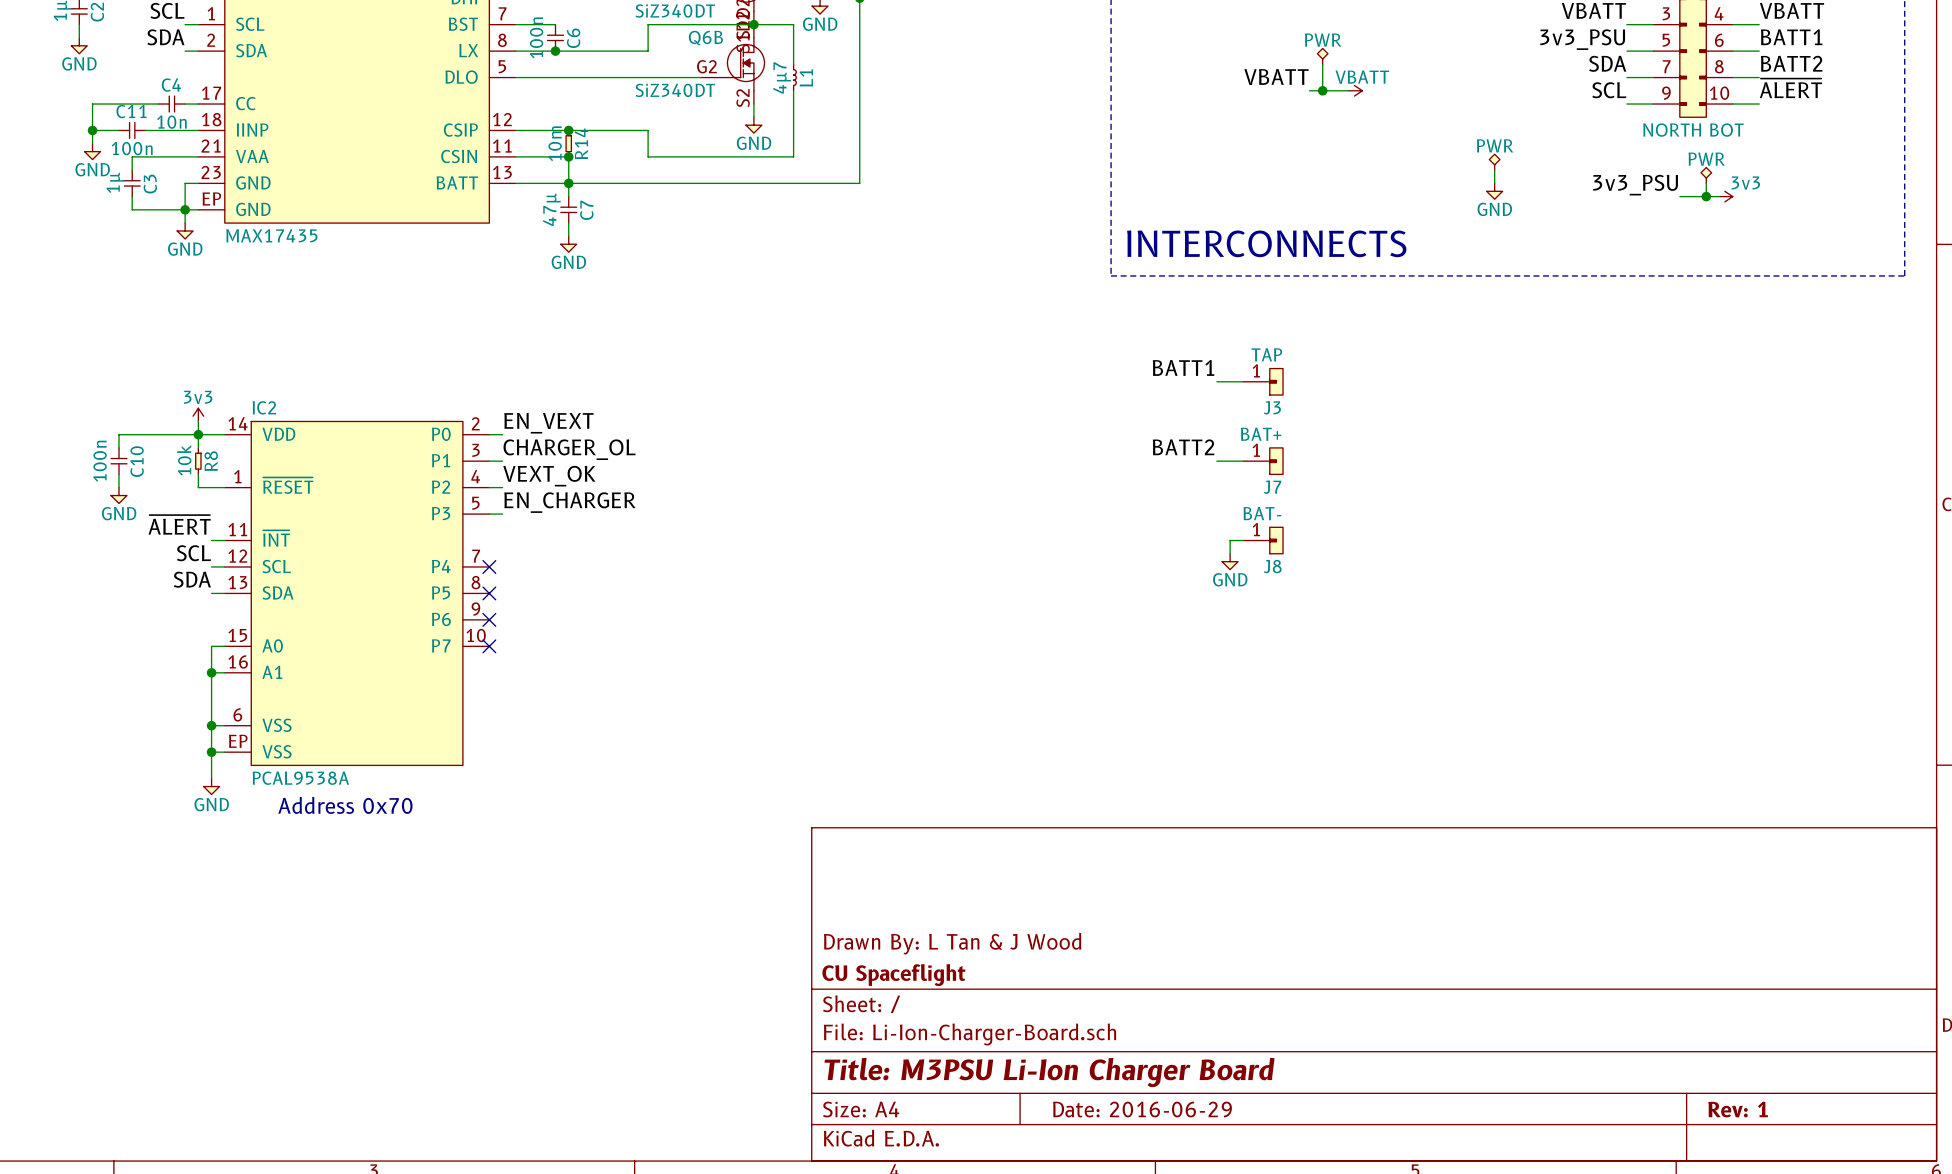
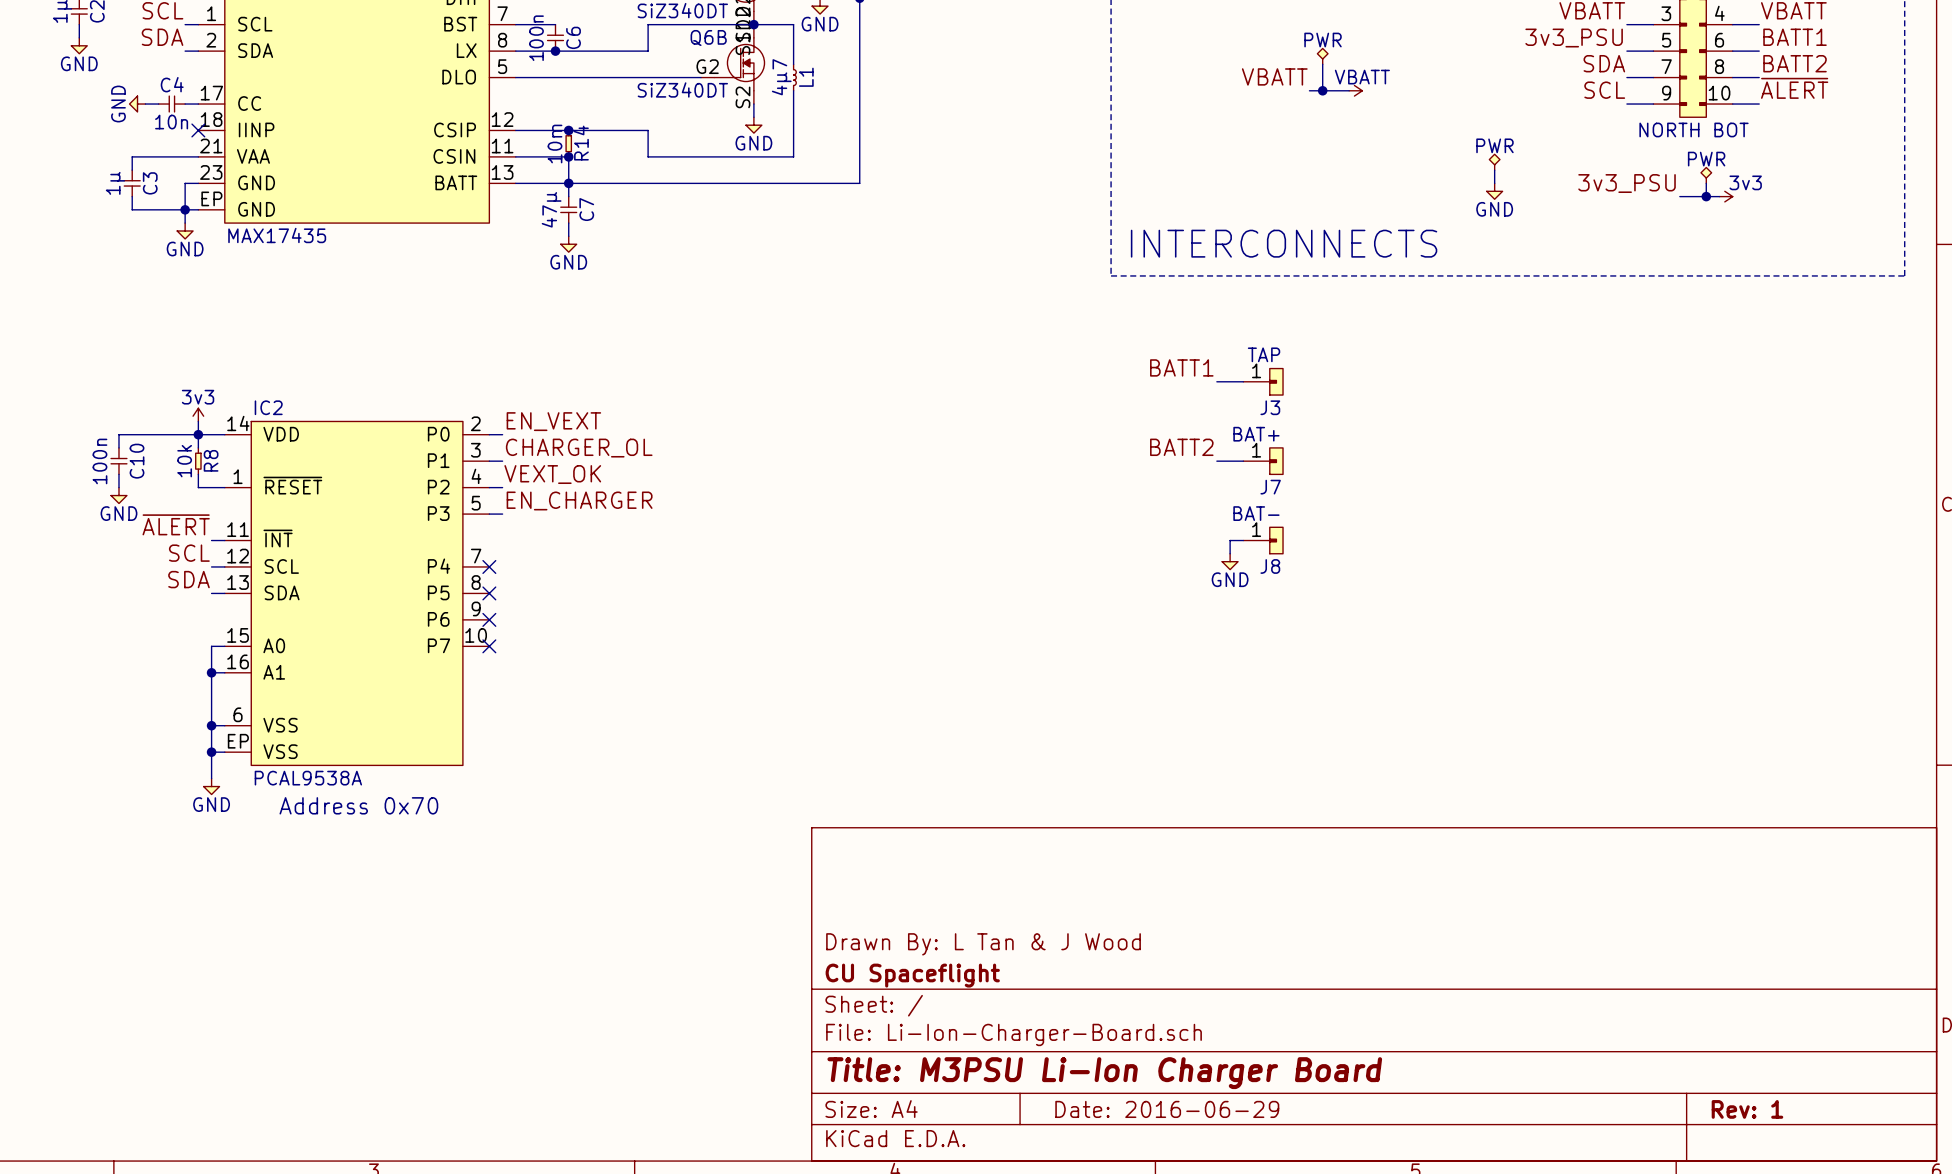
wire: (145, 104) (92, 104) (92, 143) -> none
wire: (92, 130) (118, 130) -> none
junction: (92, 130) -> none
C11: 100n (132, 130) -> none
wire: (145, 130) (198, 130) -> none
no-connect mark: none -> (198, 130)
power symbol rotation: 0° (92, 151) -> 90° clockwise (137, 104)
power symbol position: GND (92, 151) -> GND (137, 104)

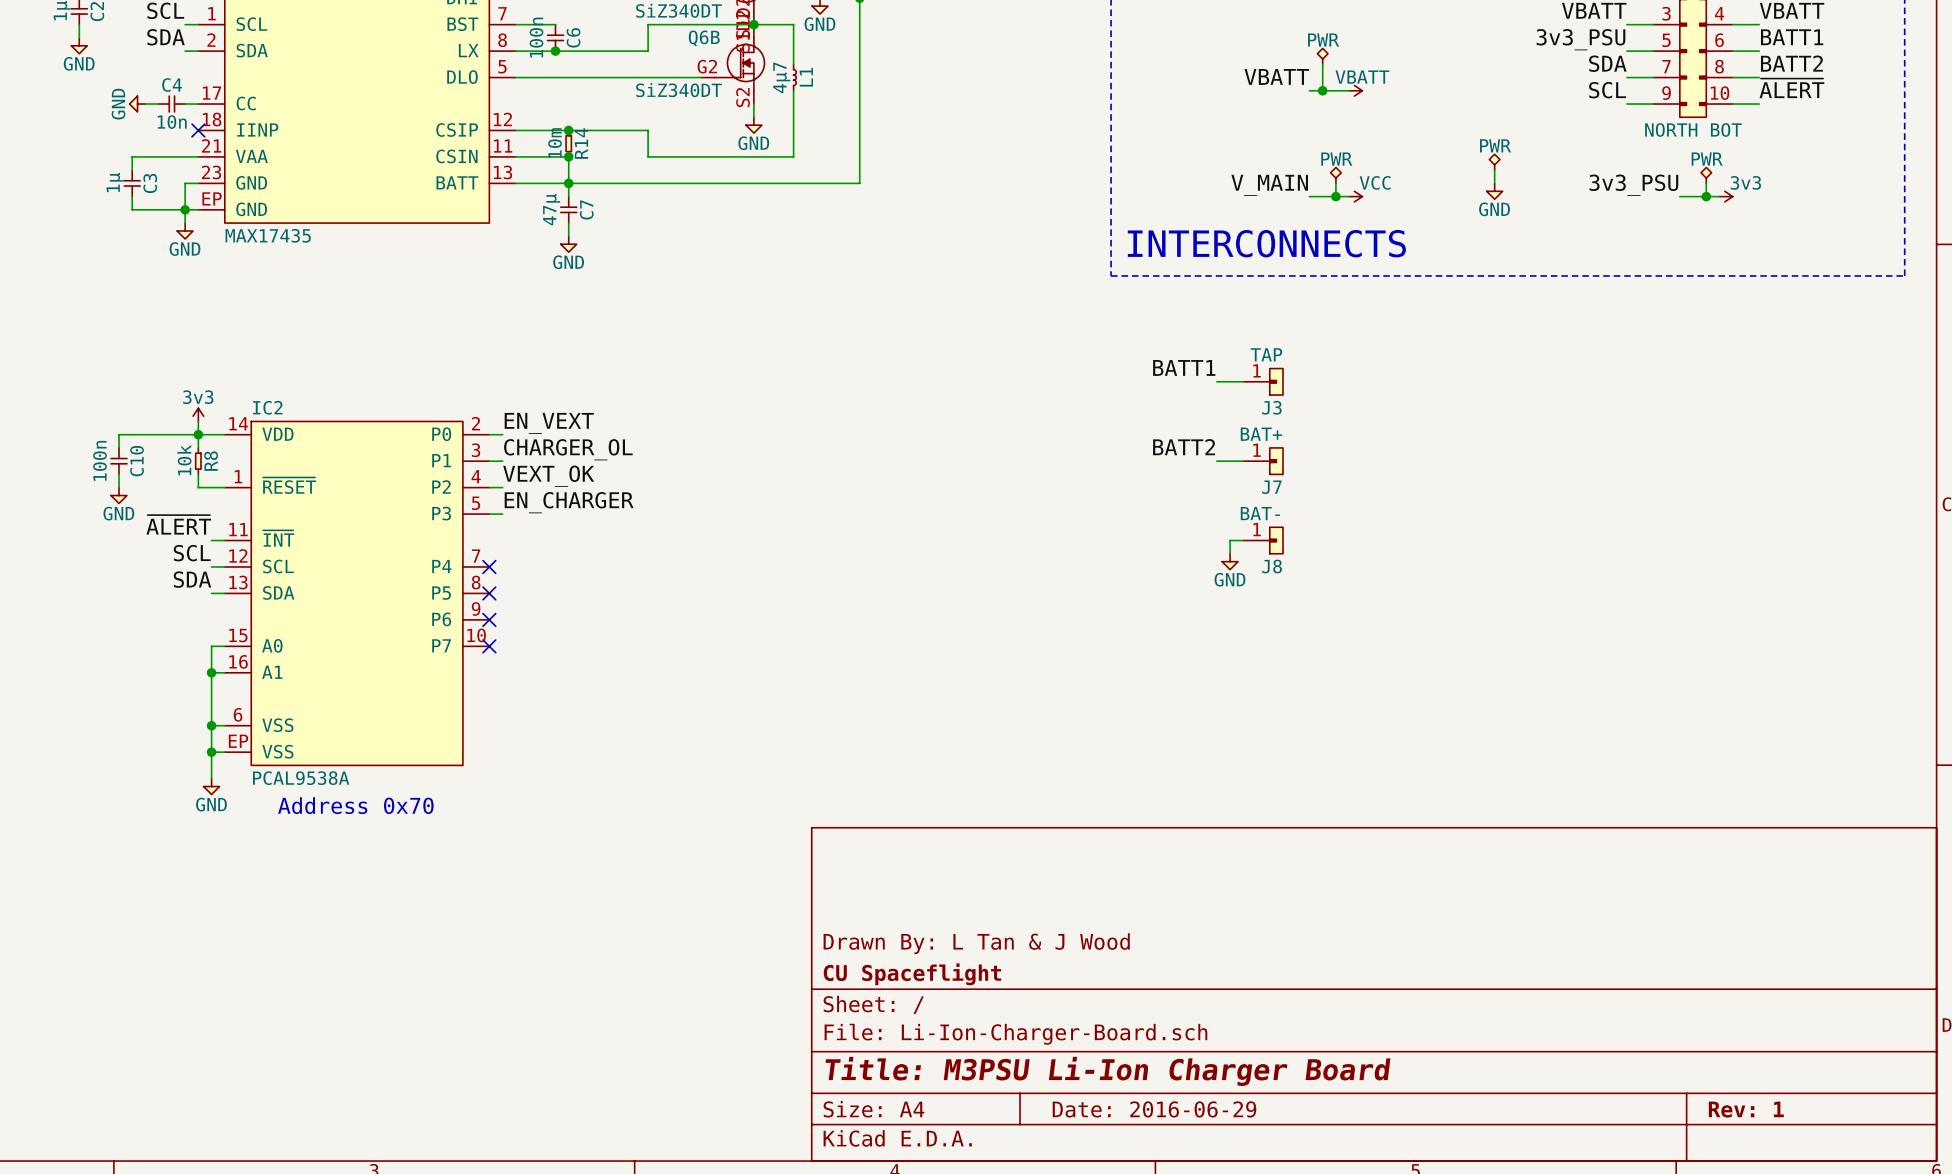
power symbol: none -> PWR (1335, 175)
label: none -> V_MAIN (1269, 185)
wire: none -> (1335, 183) (1335, 196)
wire: none -> (1309, 196) (1349, 196)
junction: none -> (1335, 196)
power symbol: none -> VCC (1355, 196)

